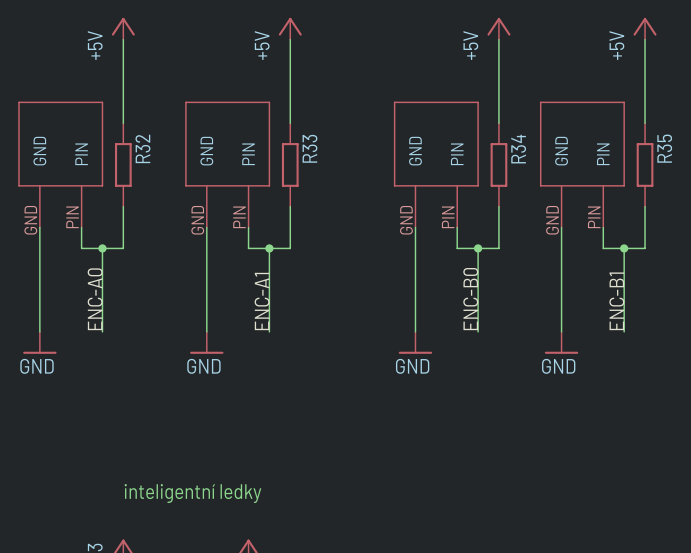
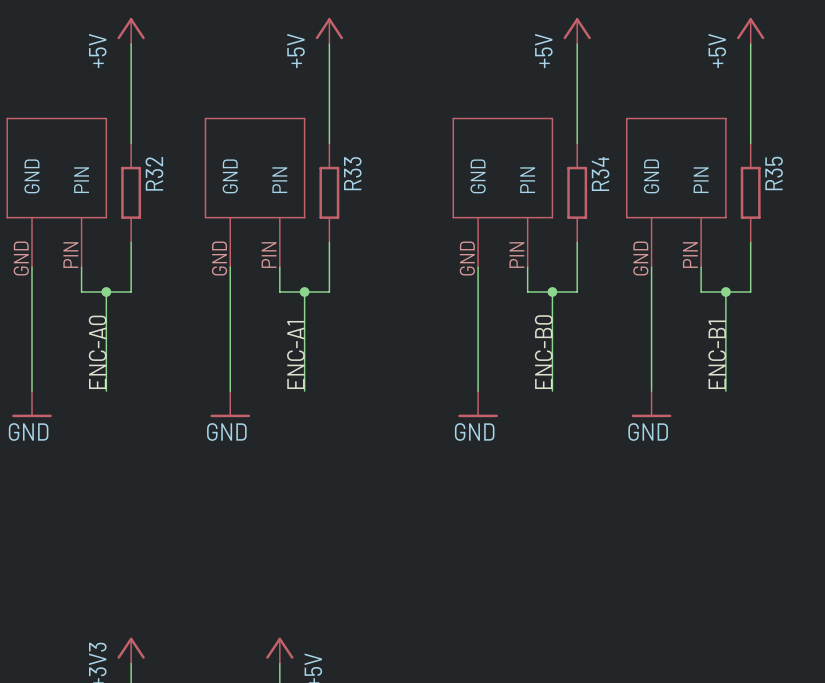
text: inteligentní ledky (192, 493) -> none

